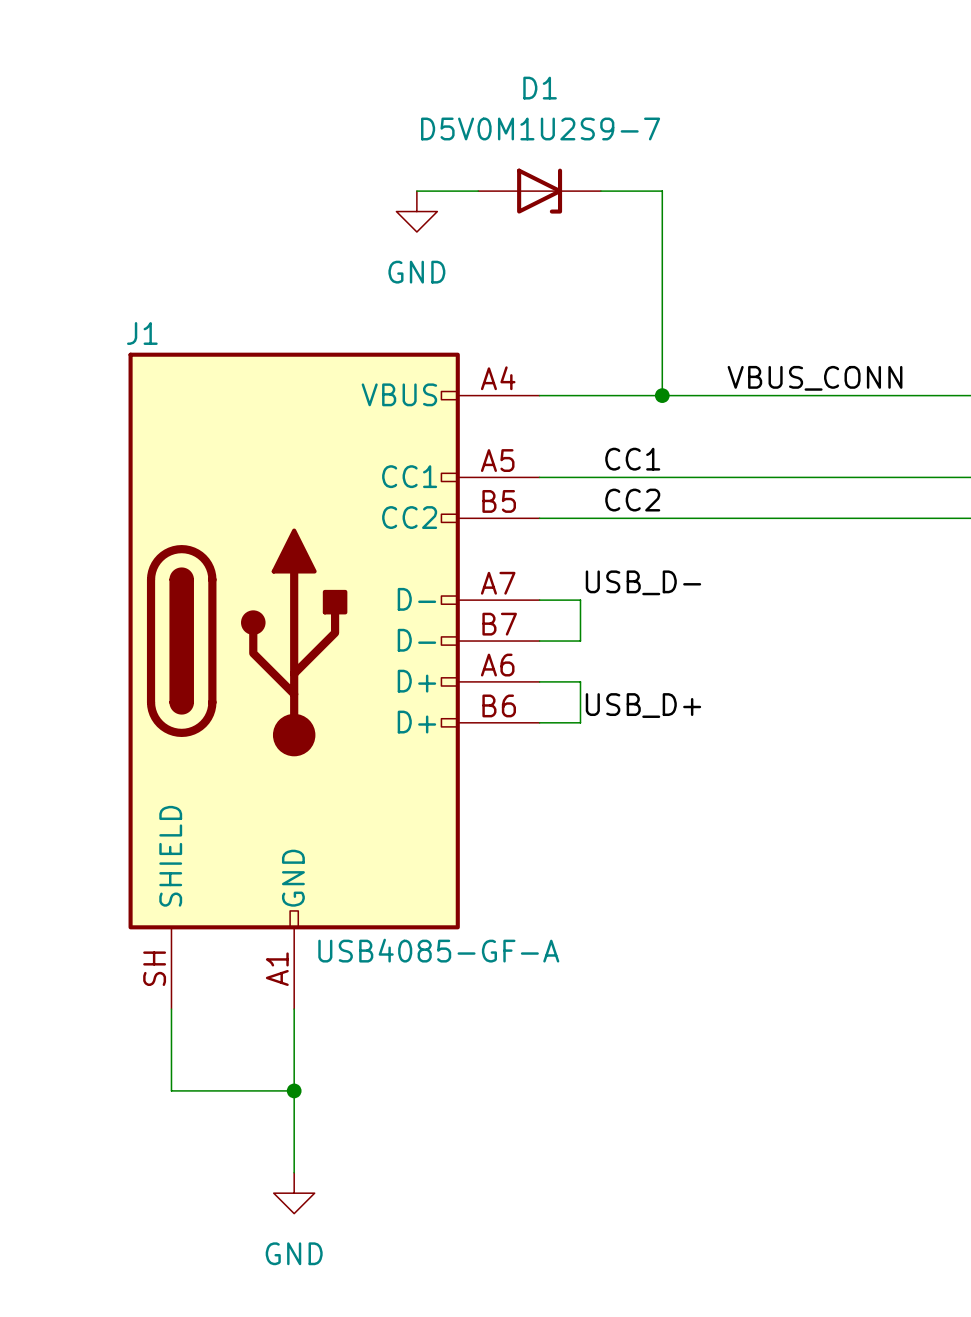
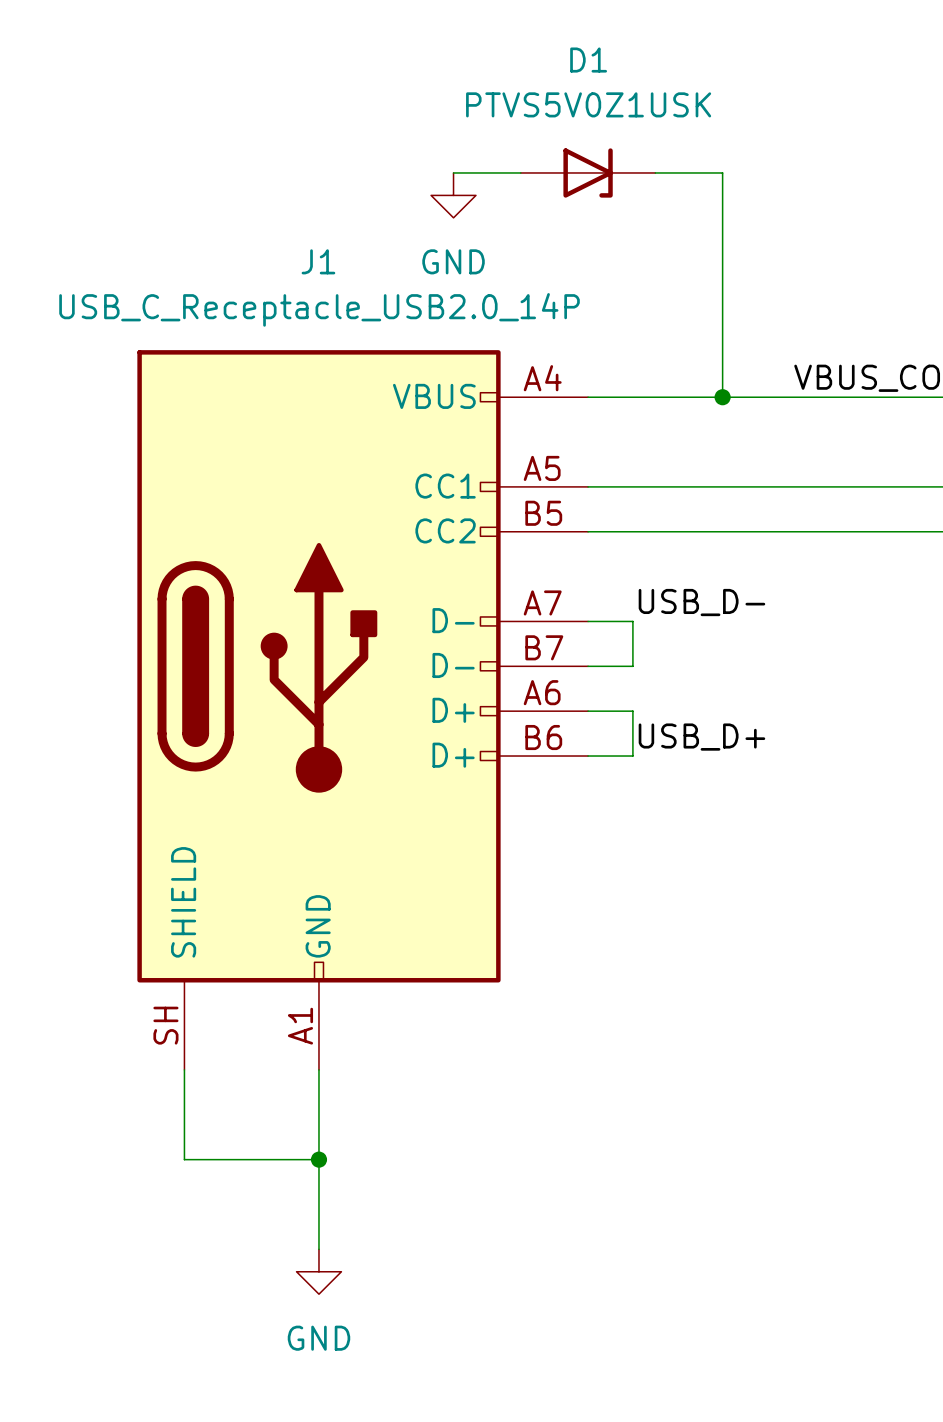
D1 value: D5V0M1U2S9-7 (540, 128) -> PTVS5V0Z1USK (588, 104)
J1 name position: J1 (142, 333) -> J1 (318, 261)
label: CC1 (632, 459) -> none
label: CC2 (632, 500) -> none
J1 value: USB4085-GF-A (438, 950) -> USB_C_Receptacle_USB2.0_14P (319, 309)

